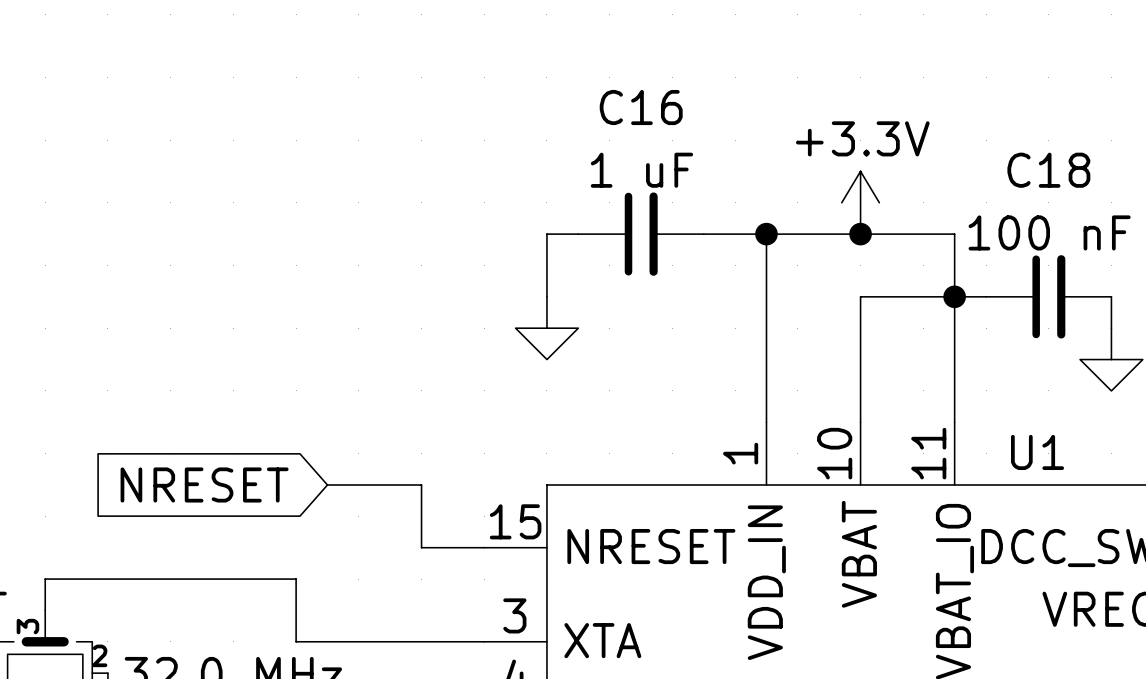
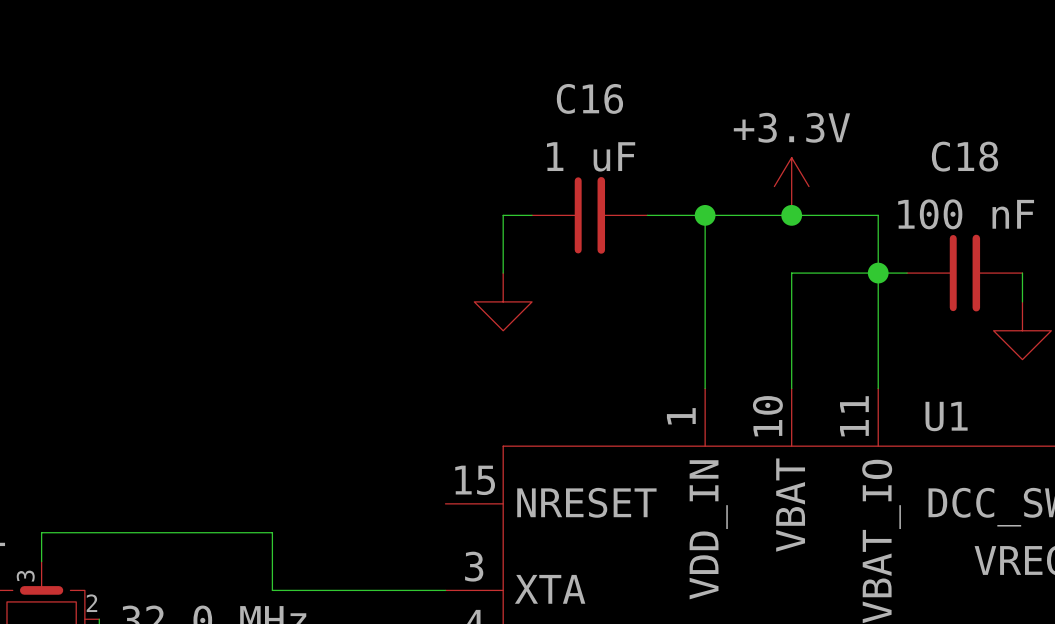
global label: NRESET (204, 484) -> none
wire: (327, 484) (421, 484) (421, 547) (484, 547) -> none

